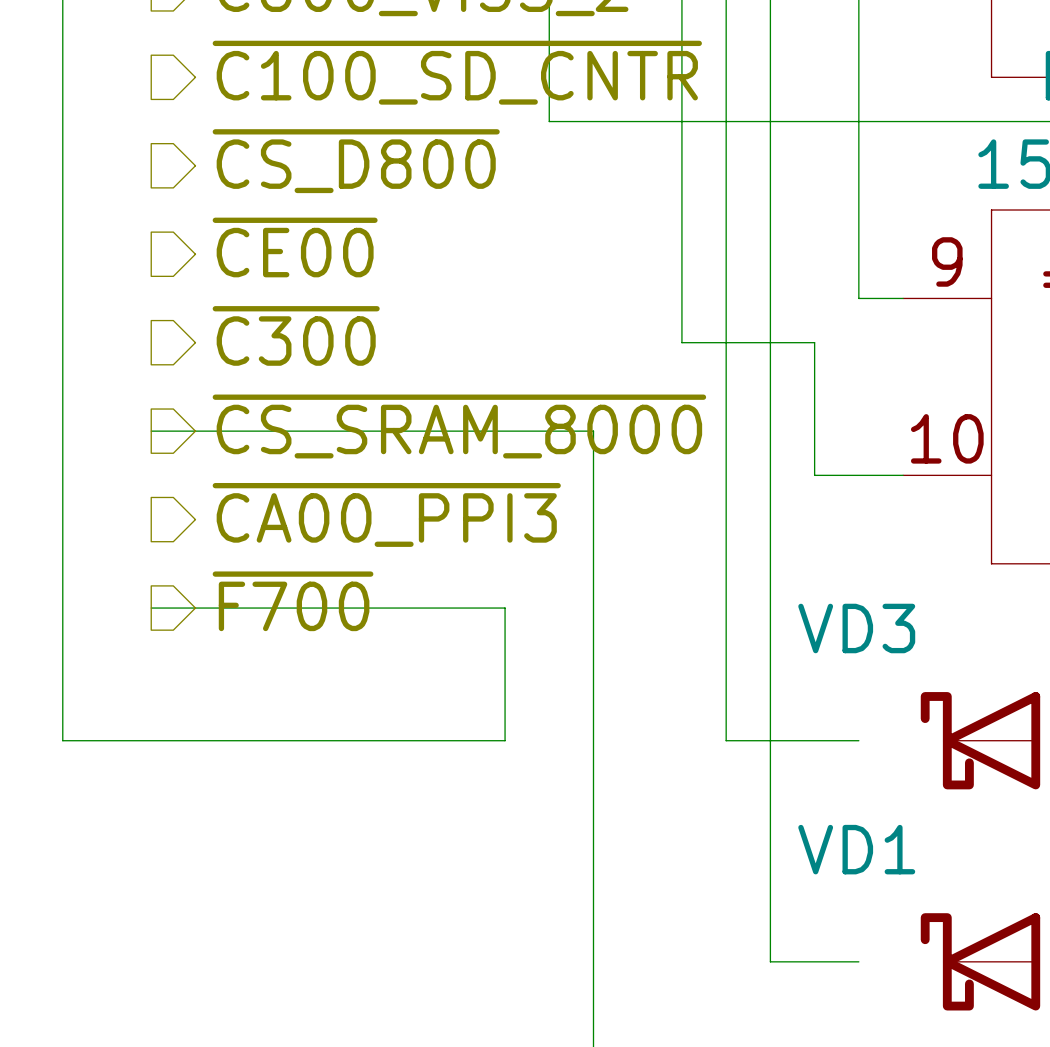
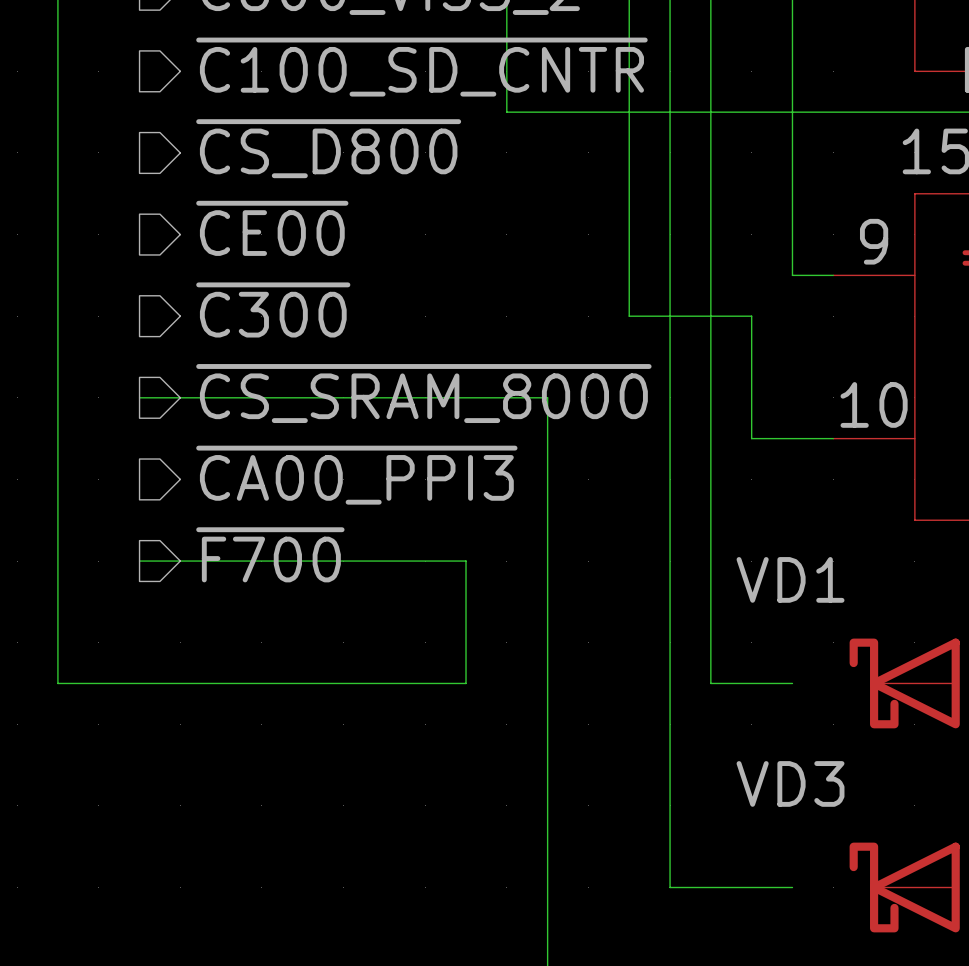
VD3 name: VD3 (856, 628) -> VD1 (790, 579)
wire: (726, 740) (770, 740) (770, 961) -> (670, 683) (670, 887) (710, 887)
VD1 name: VD1 (856, 849) -> VD3 (790, 783)

